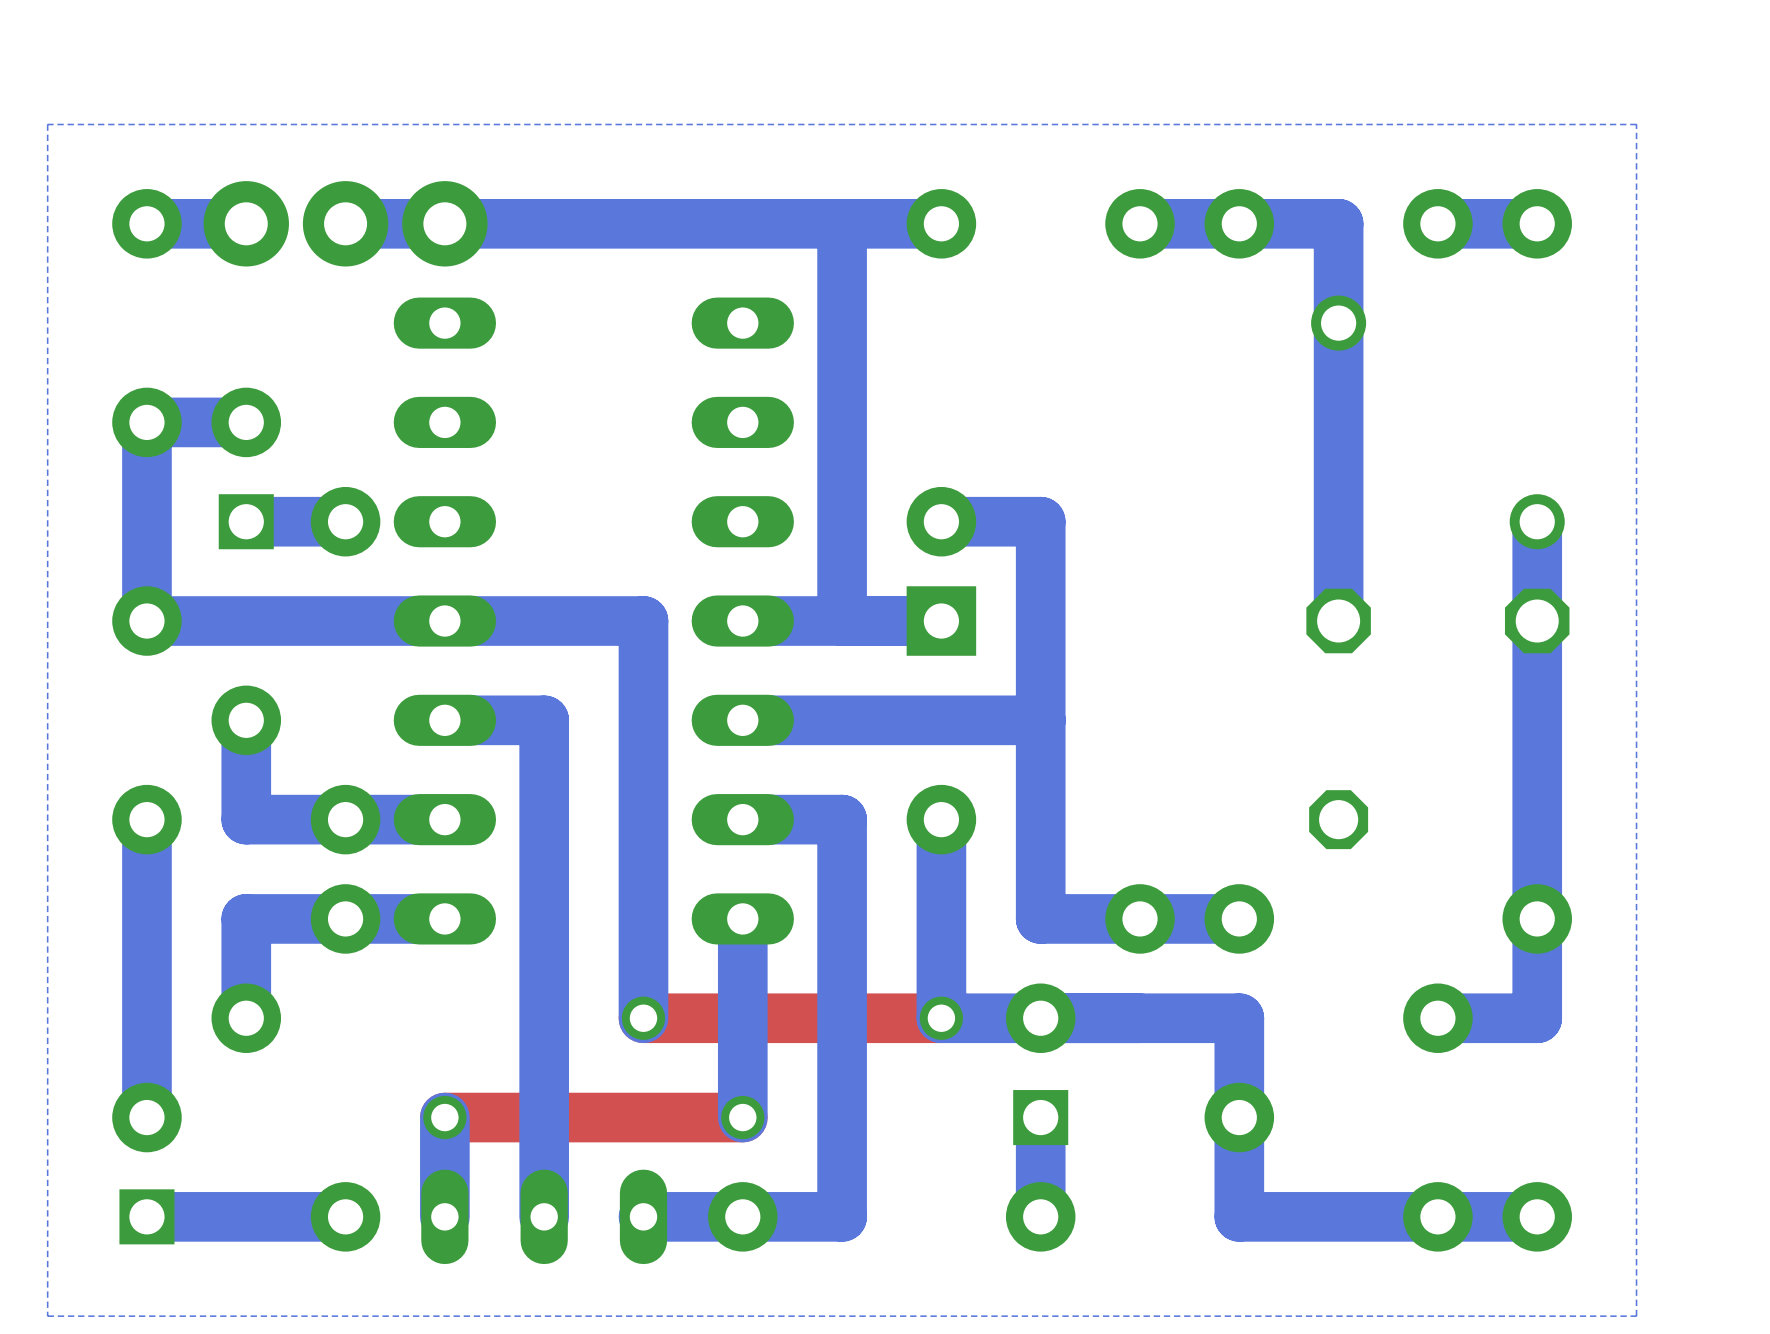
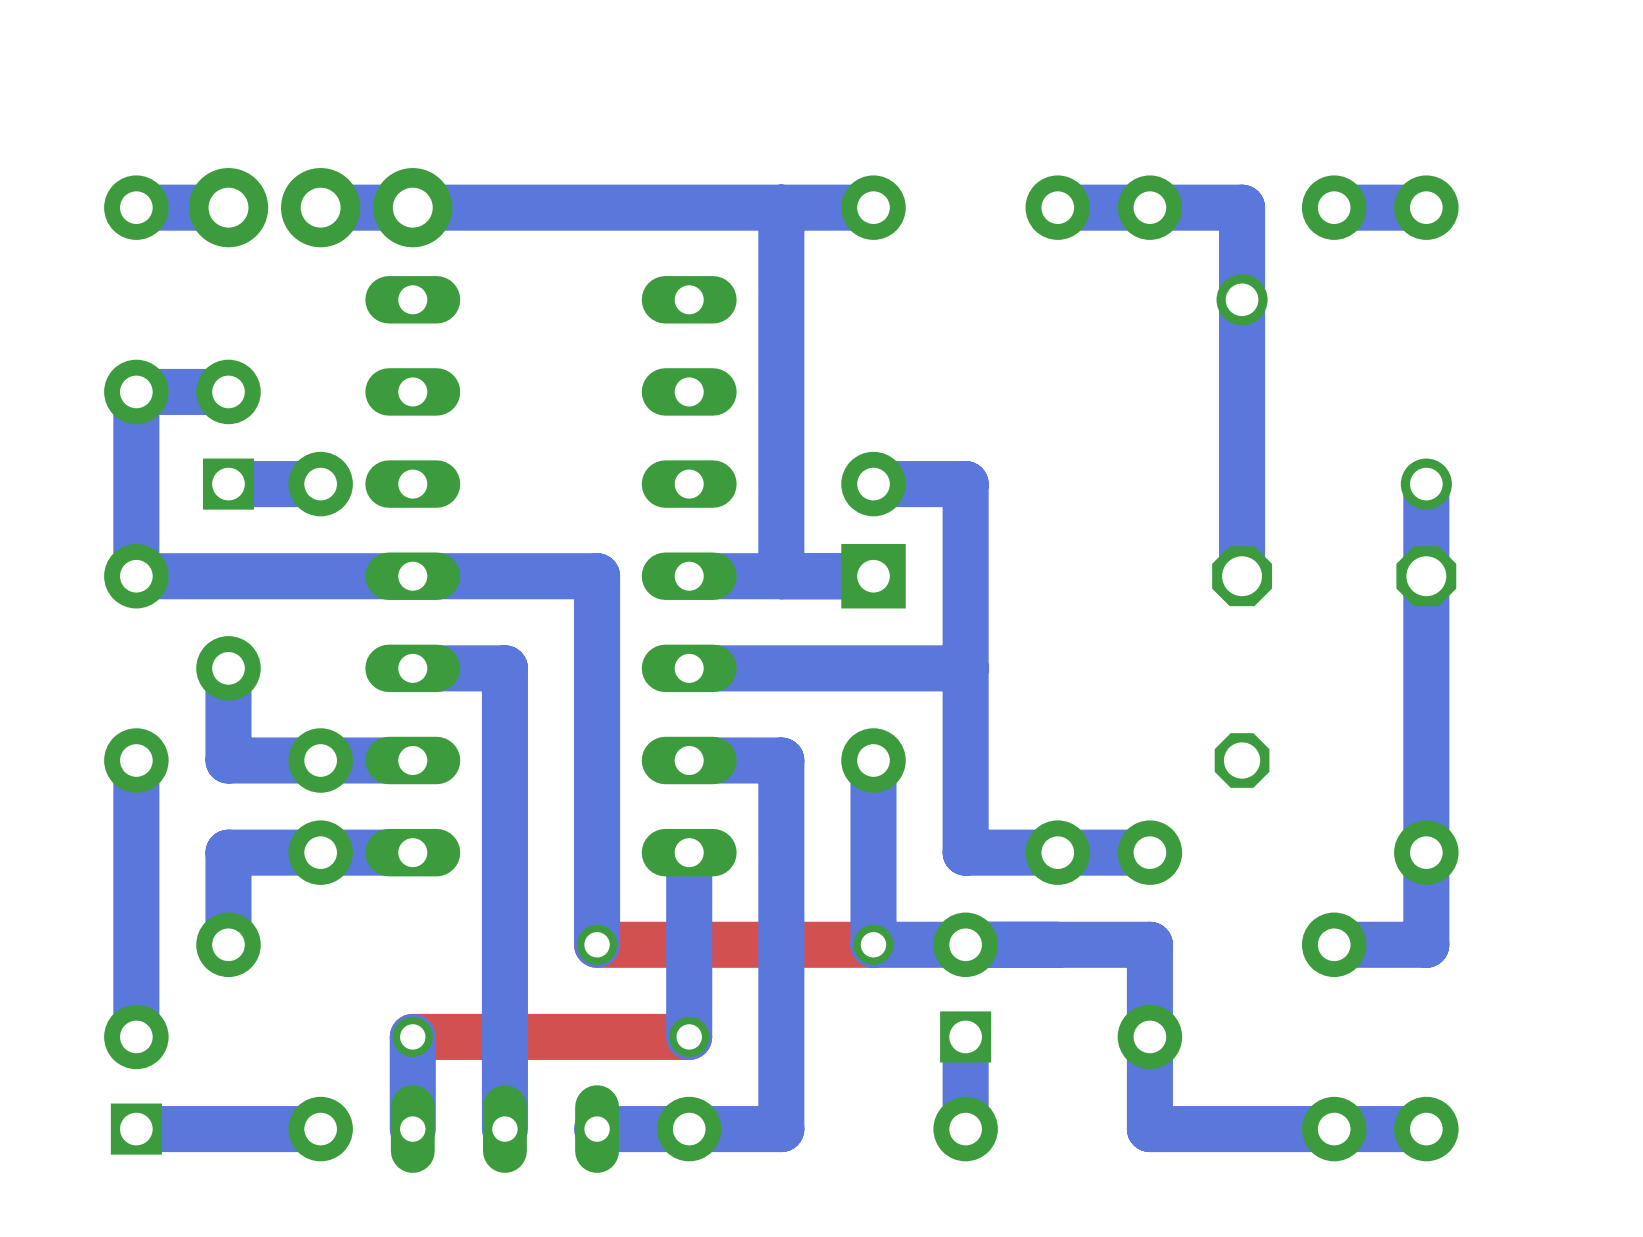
bottom zone outline: (1636, 124) (47, 124) (47, 1316) (1636, 1316) (1636, 124) -> none

